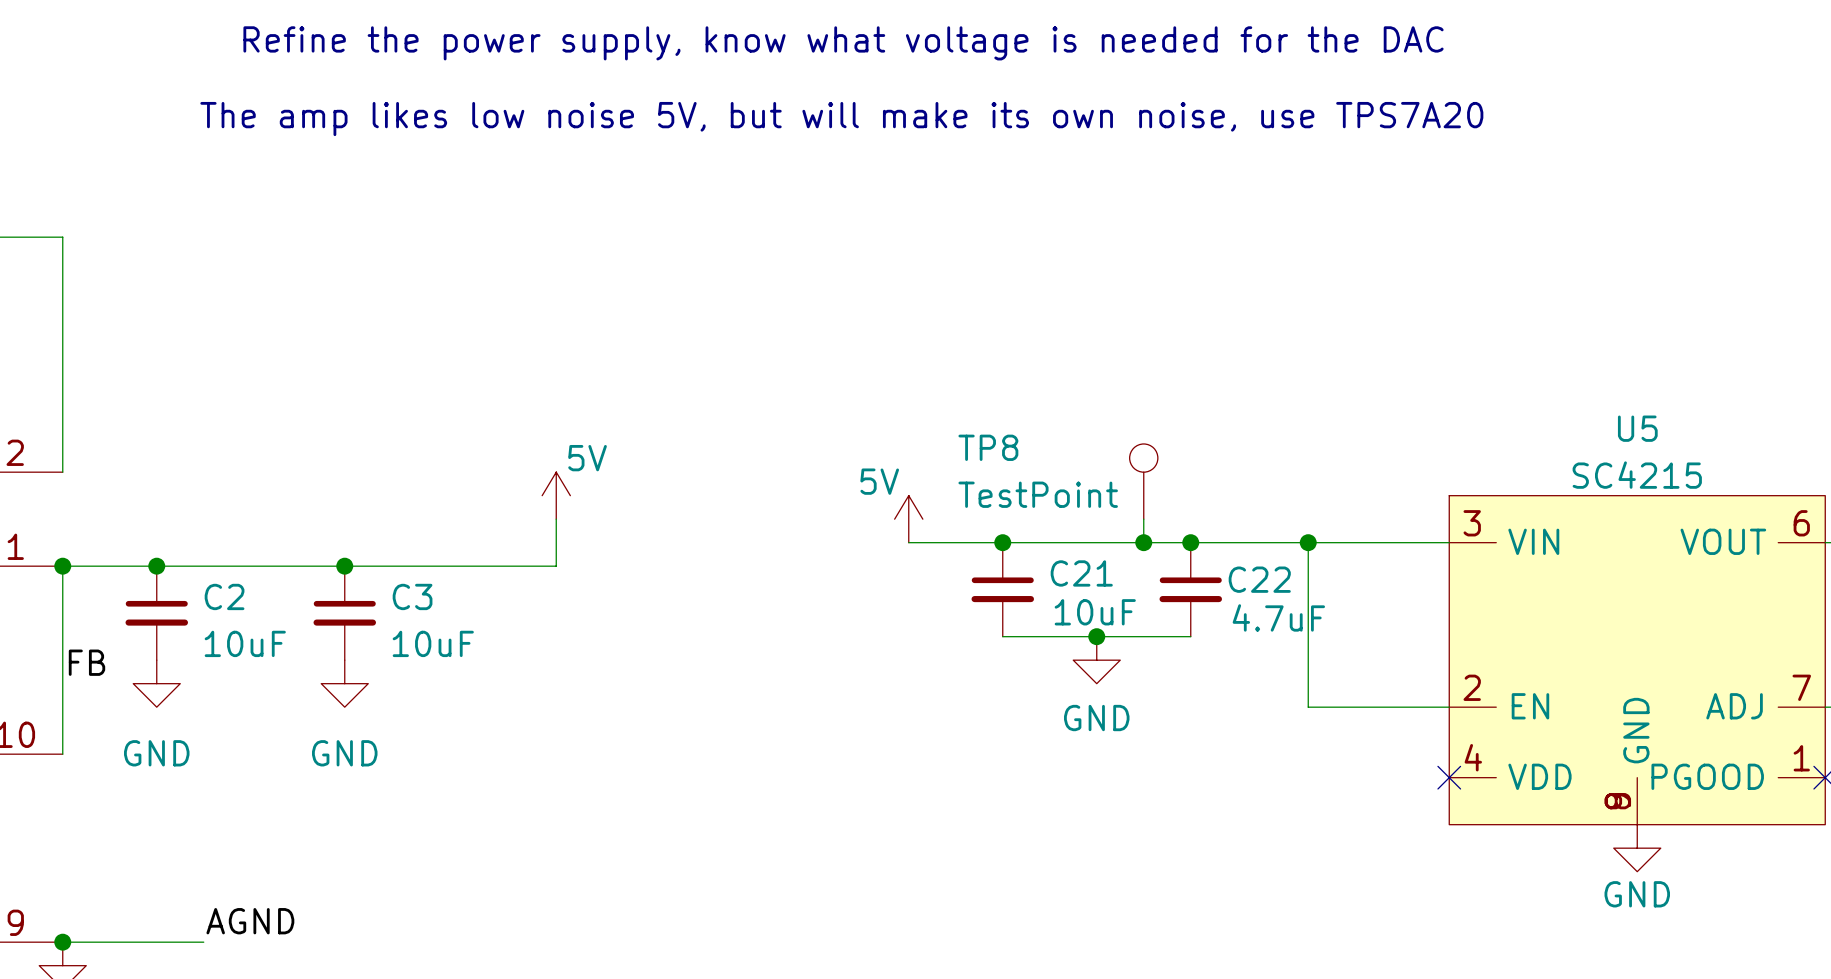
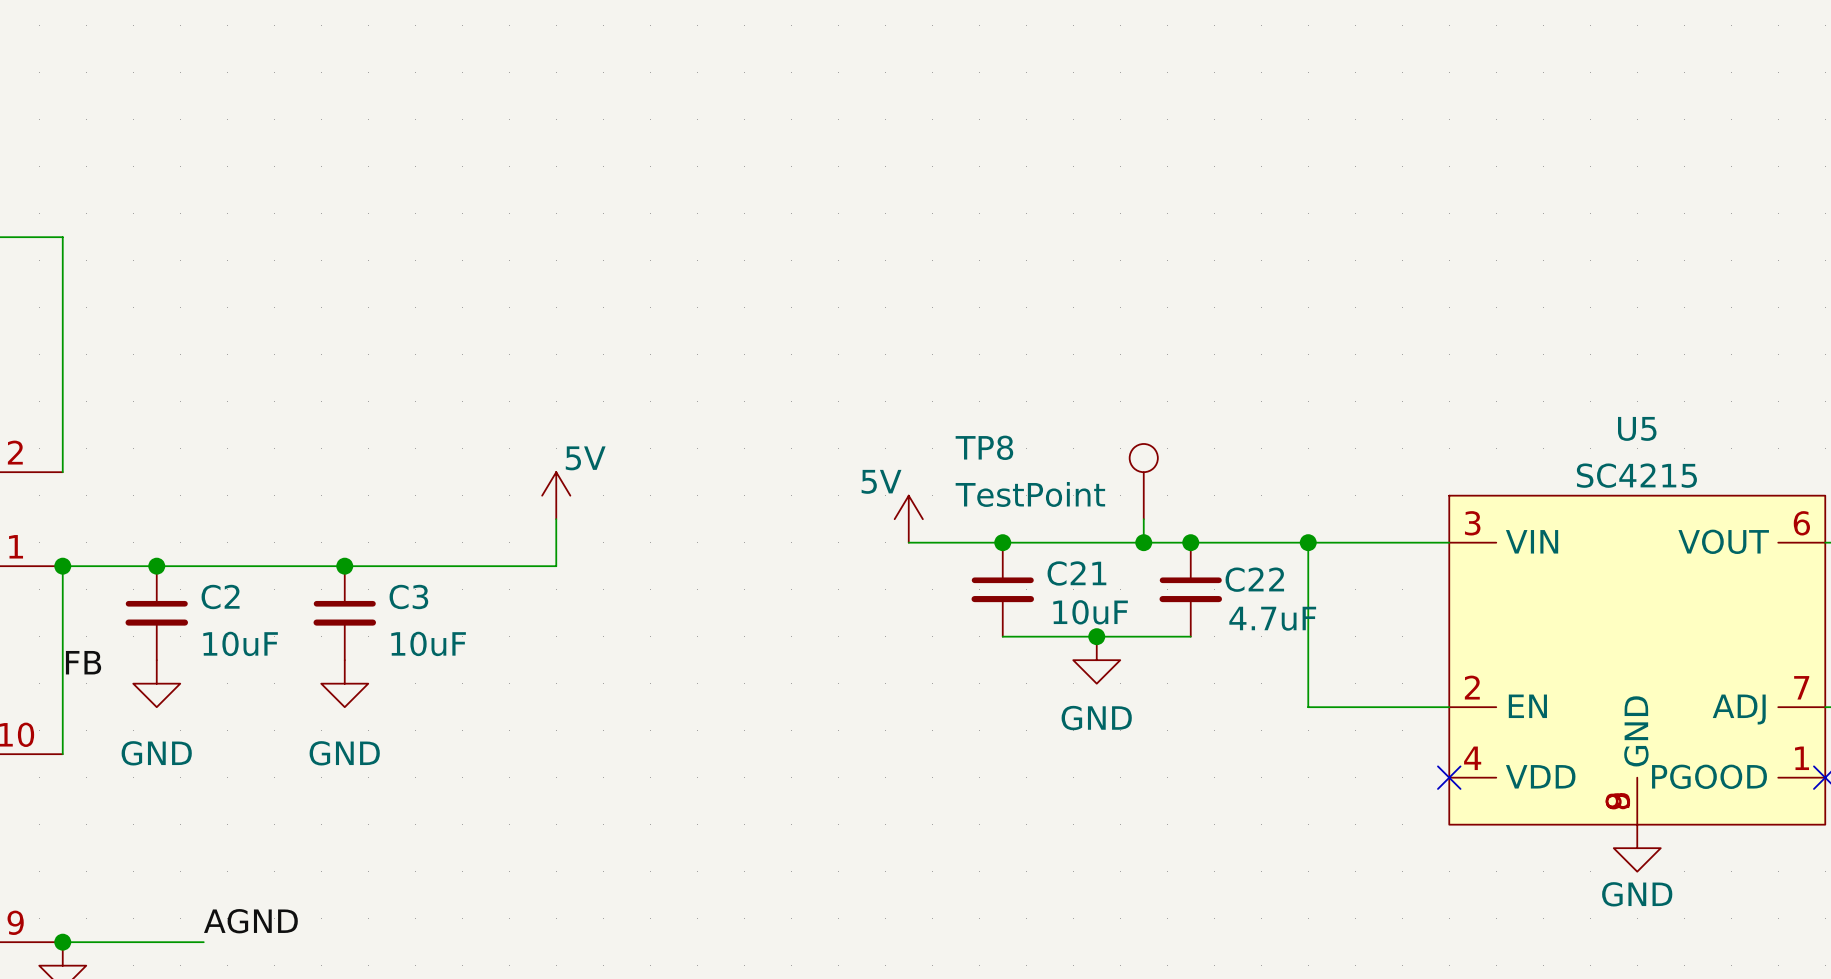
text: Refine the power supply, know what voltage is needed for the DAC (843, 43) -> none
text: The amp likes low noise 5V, but will make its own noise, use TPS7A20 (841, 119) -> none

